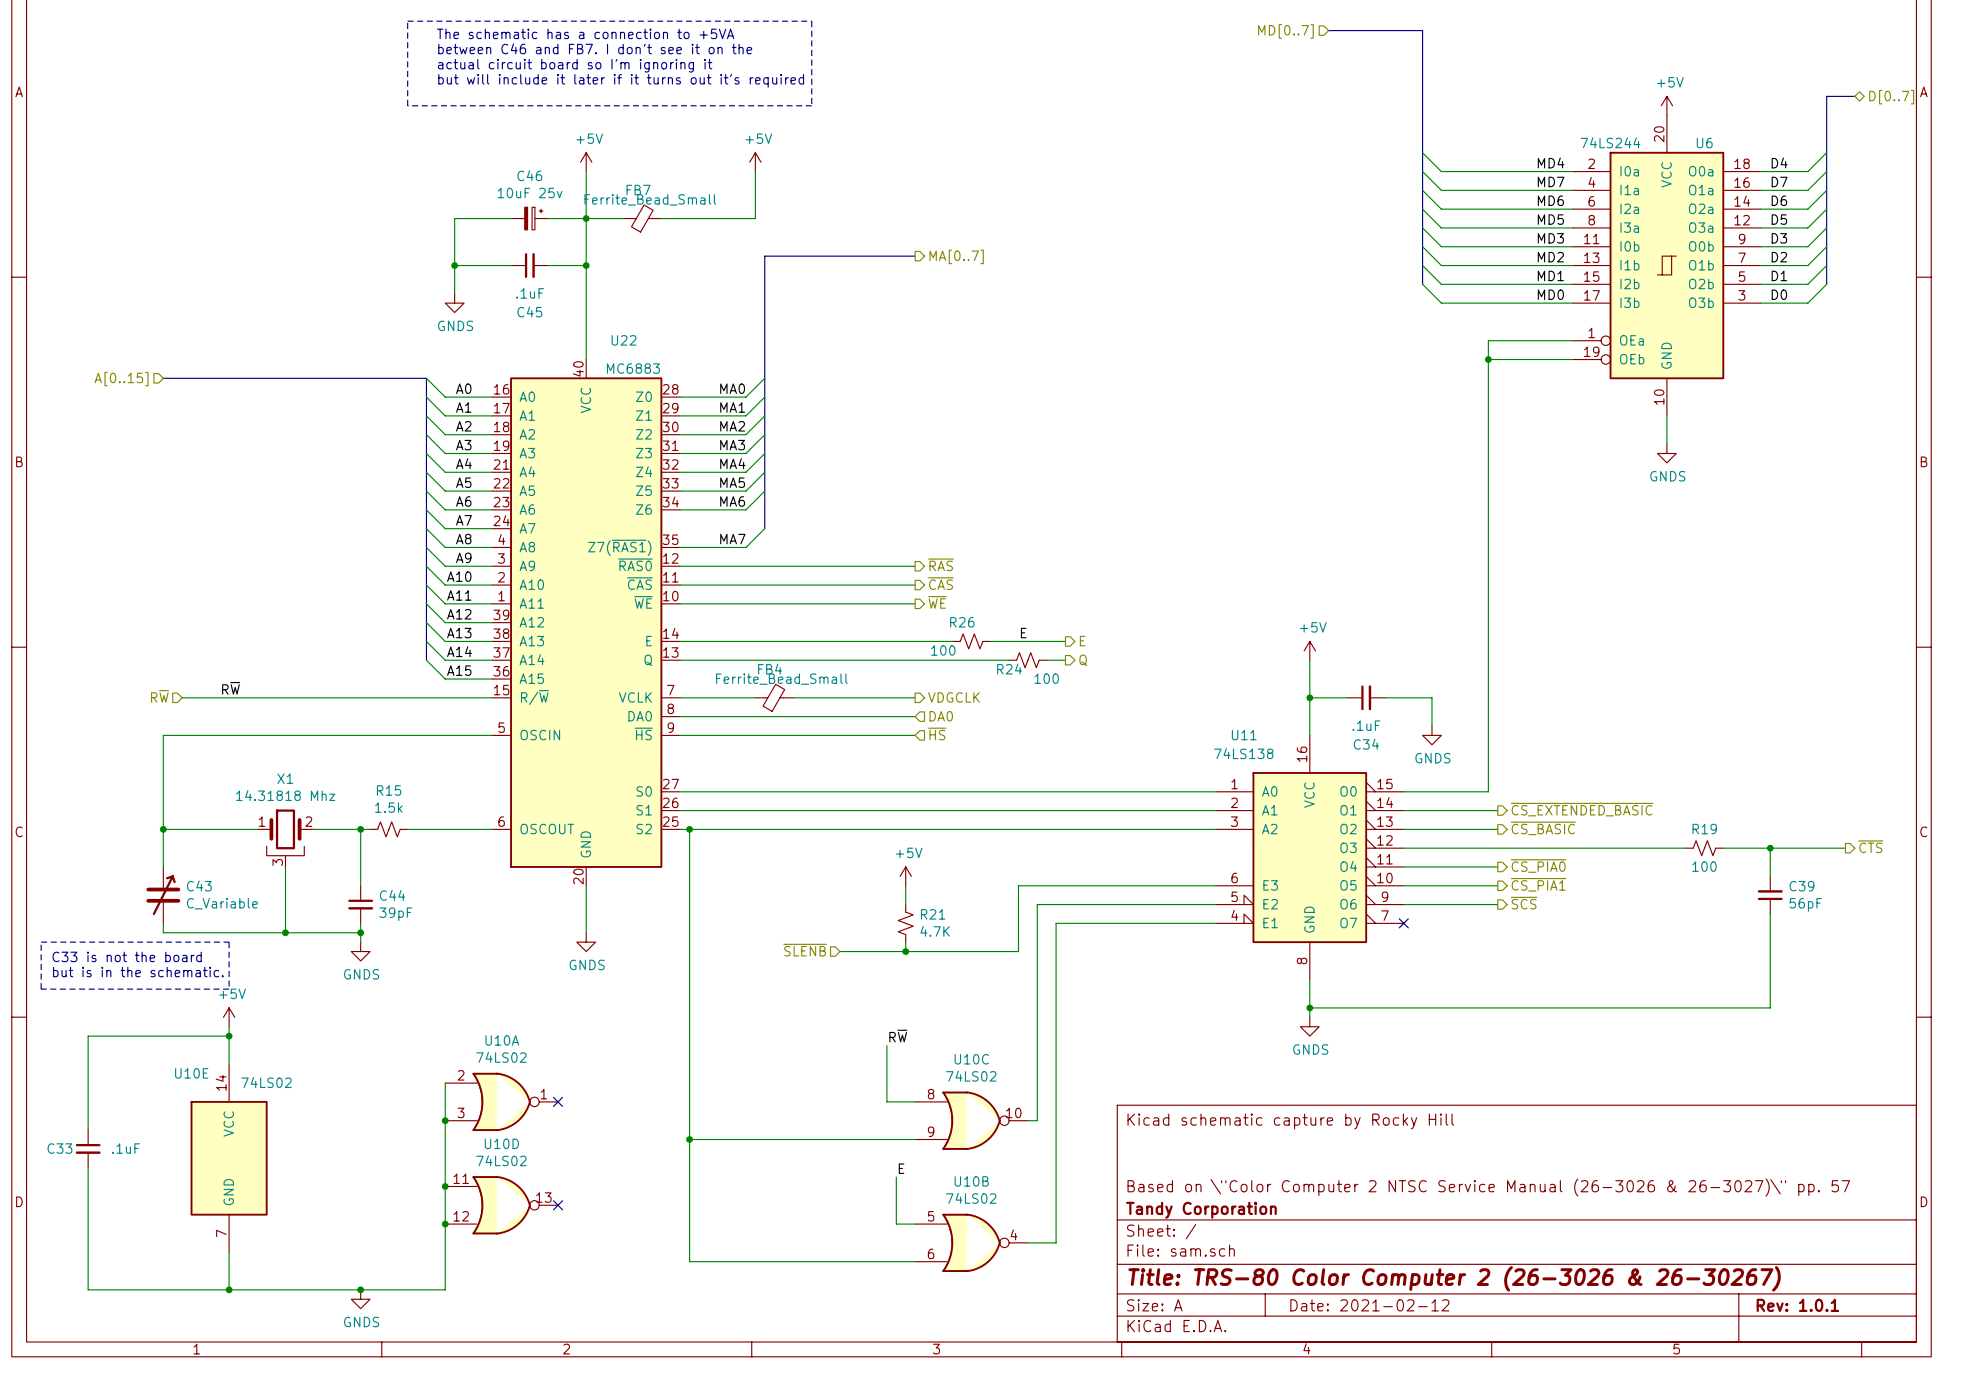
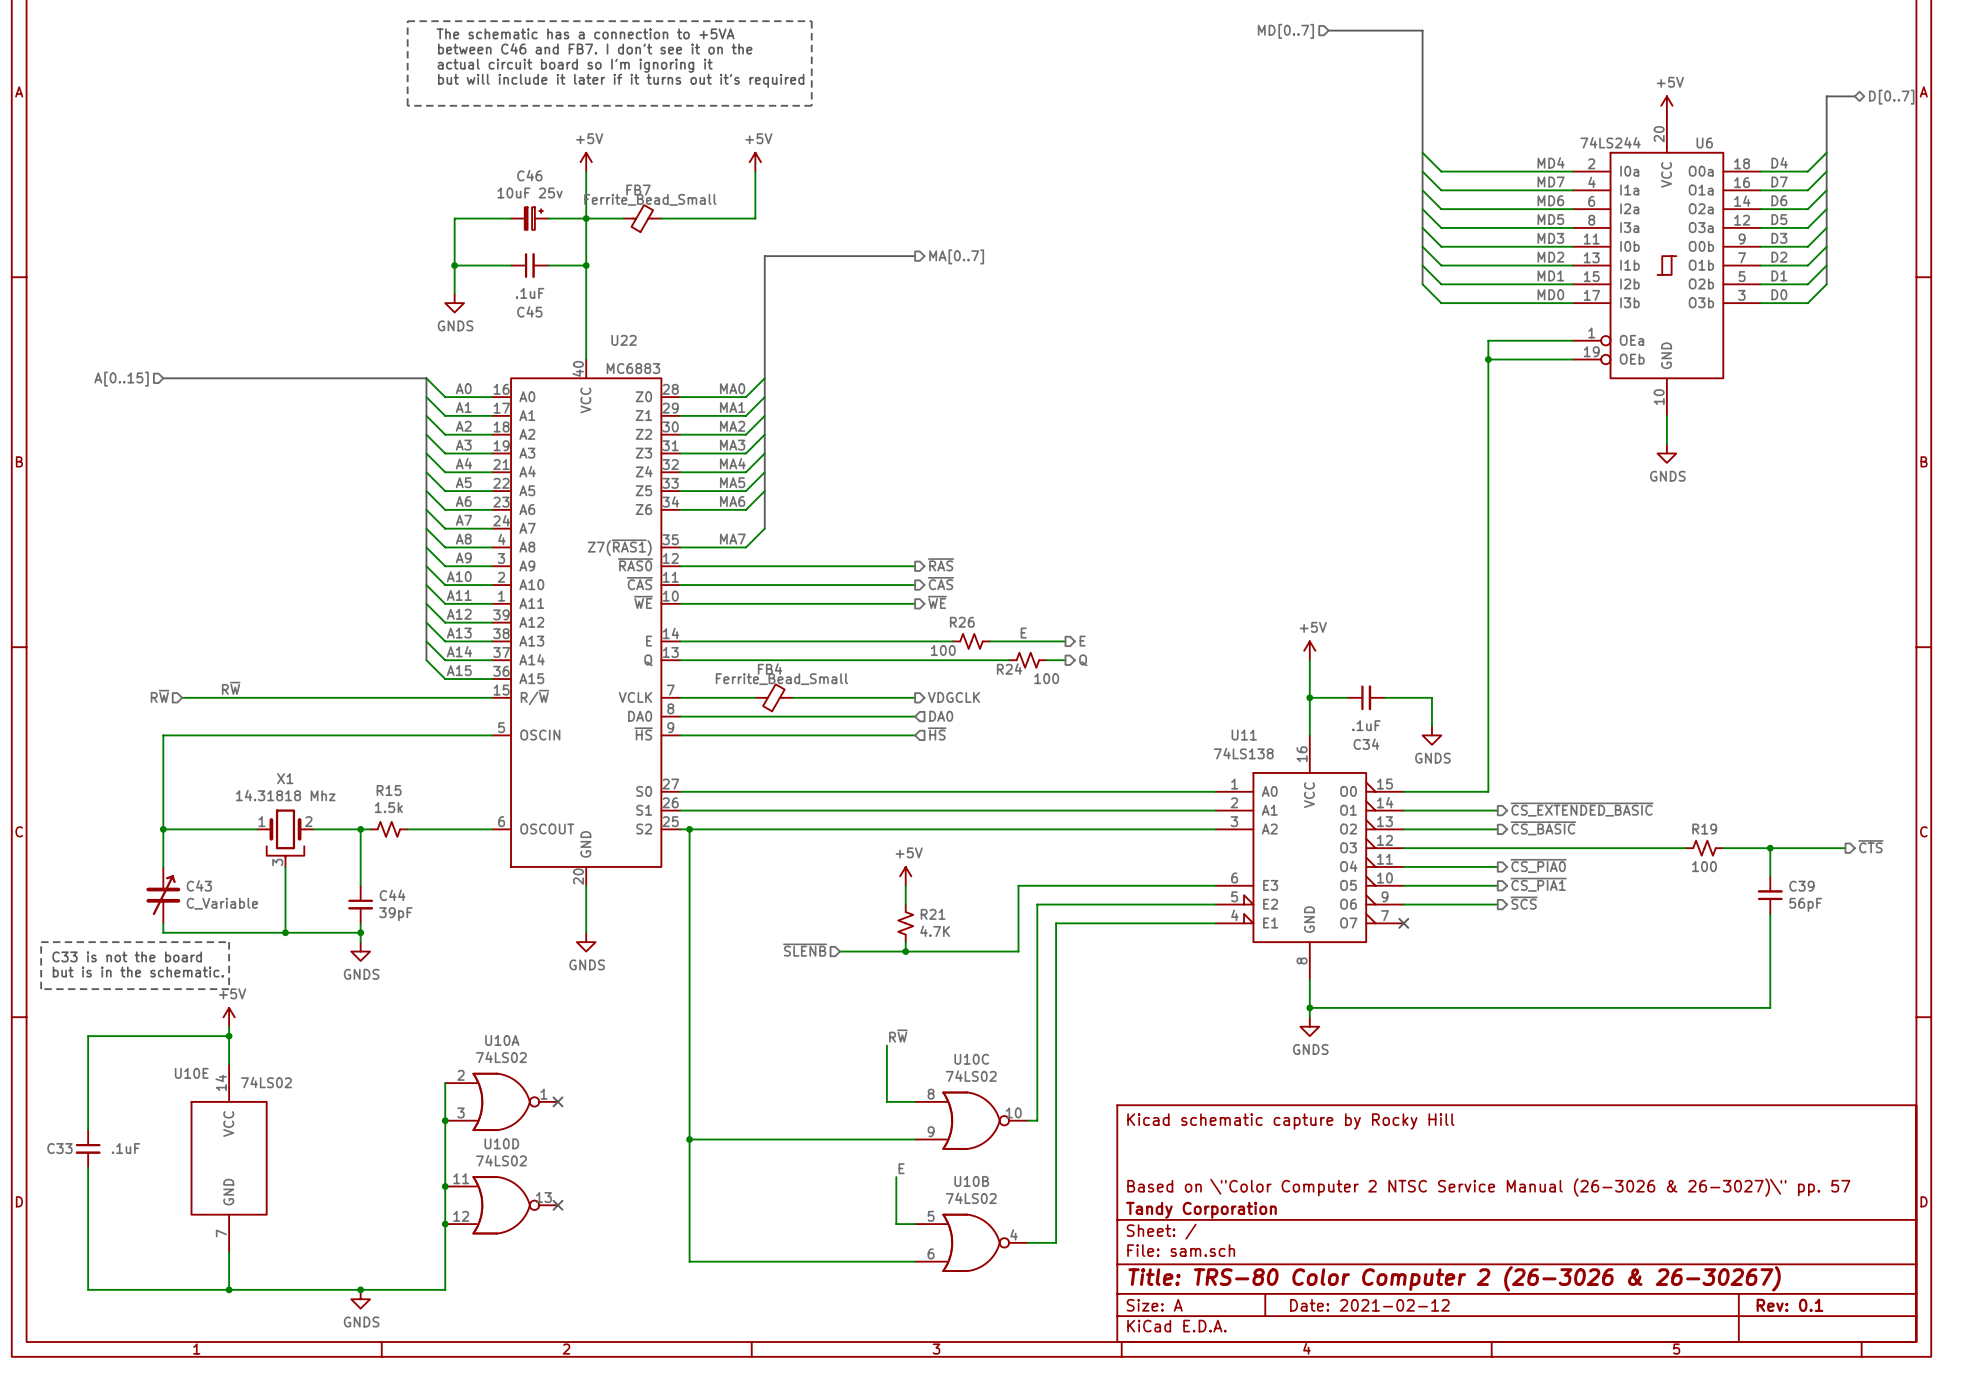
title block: Rev: 1.0.1 (1797, 1305) -> Rev: 0.1 (1789, 1305)

